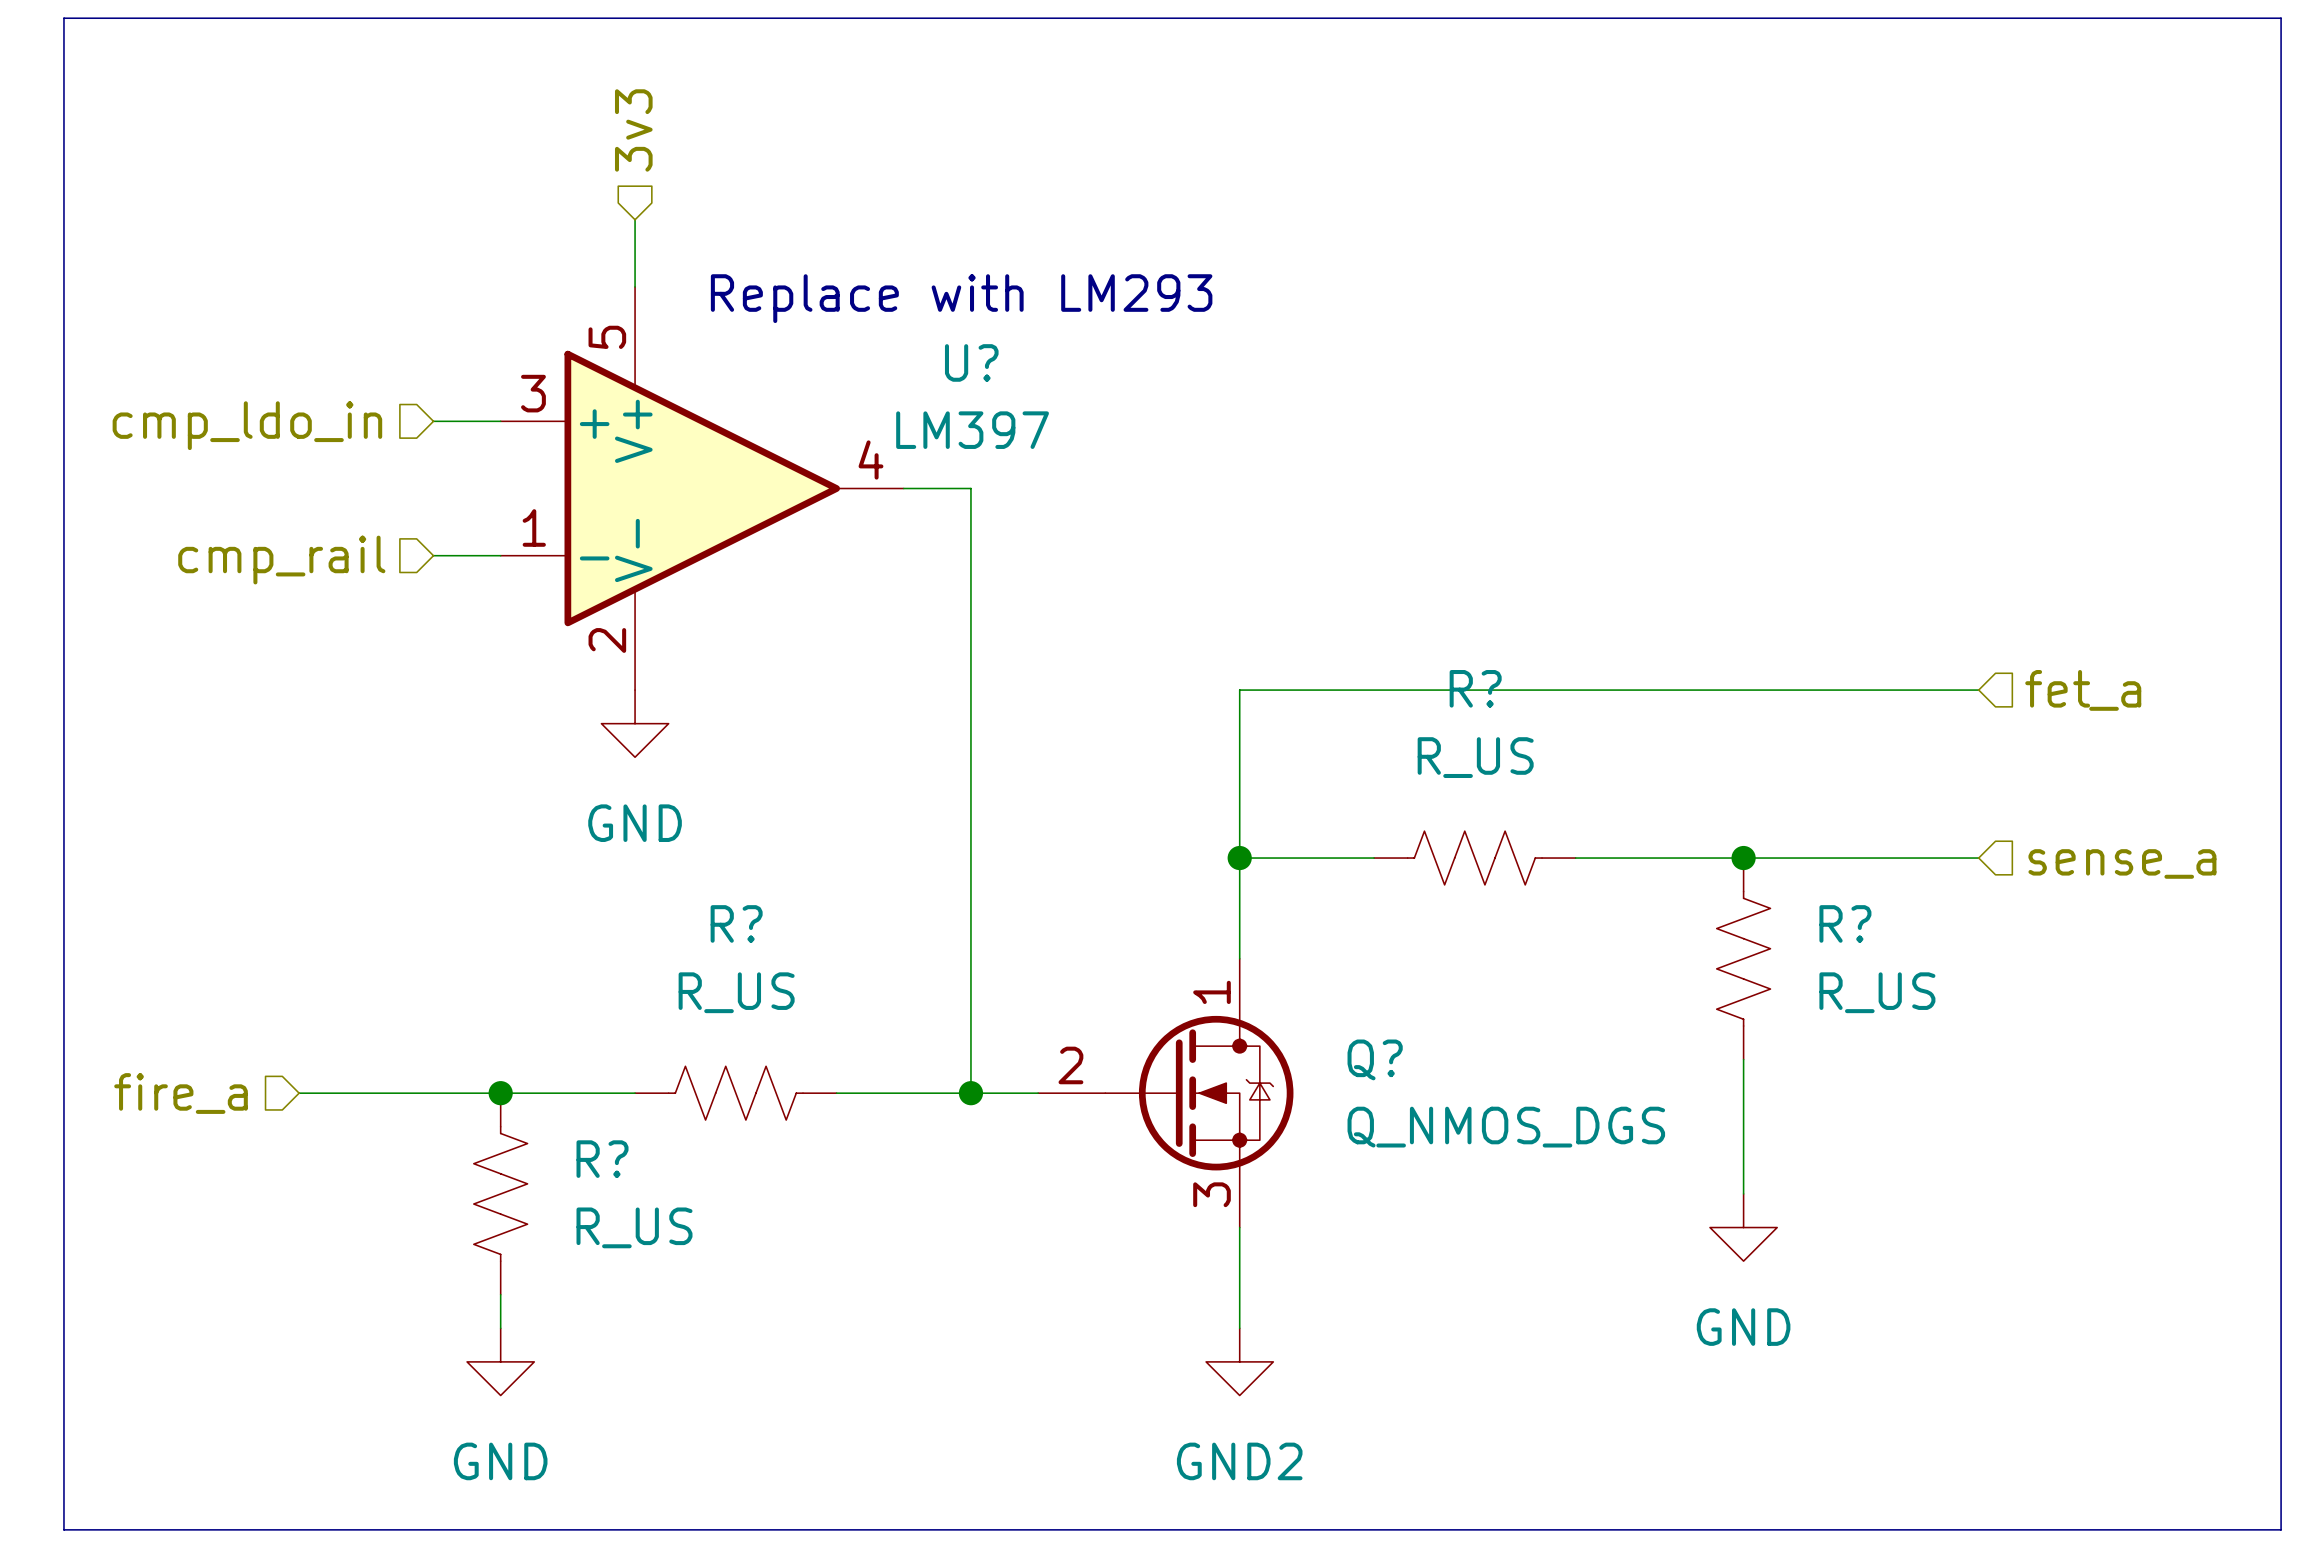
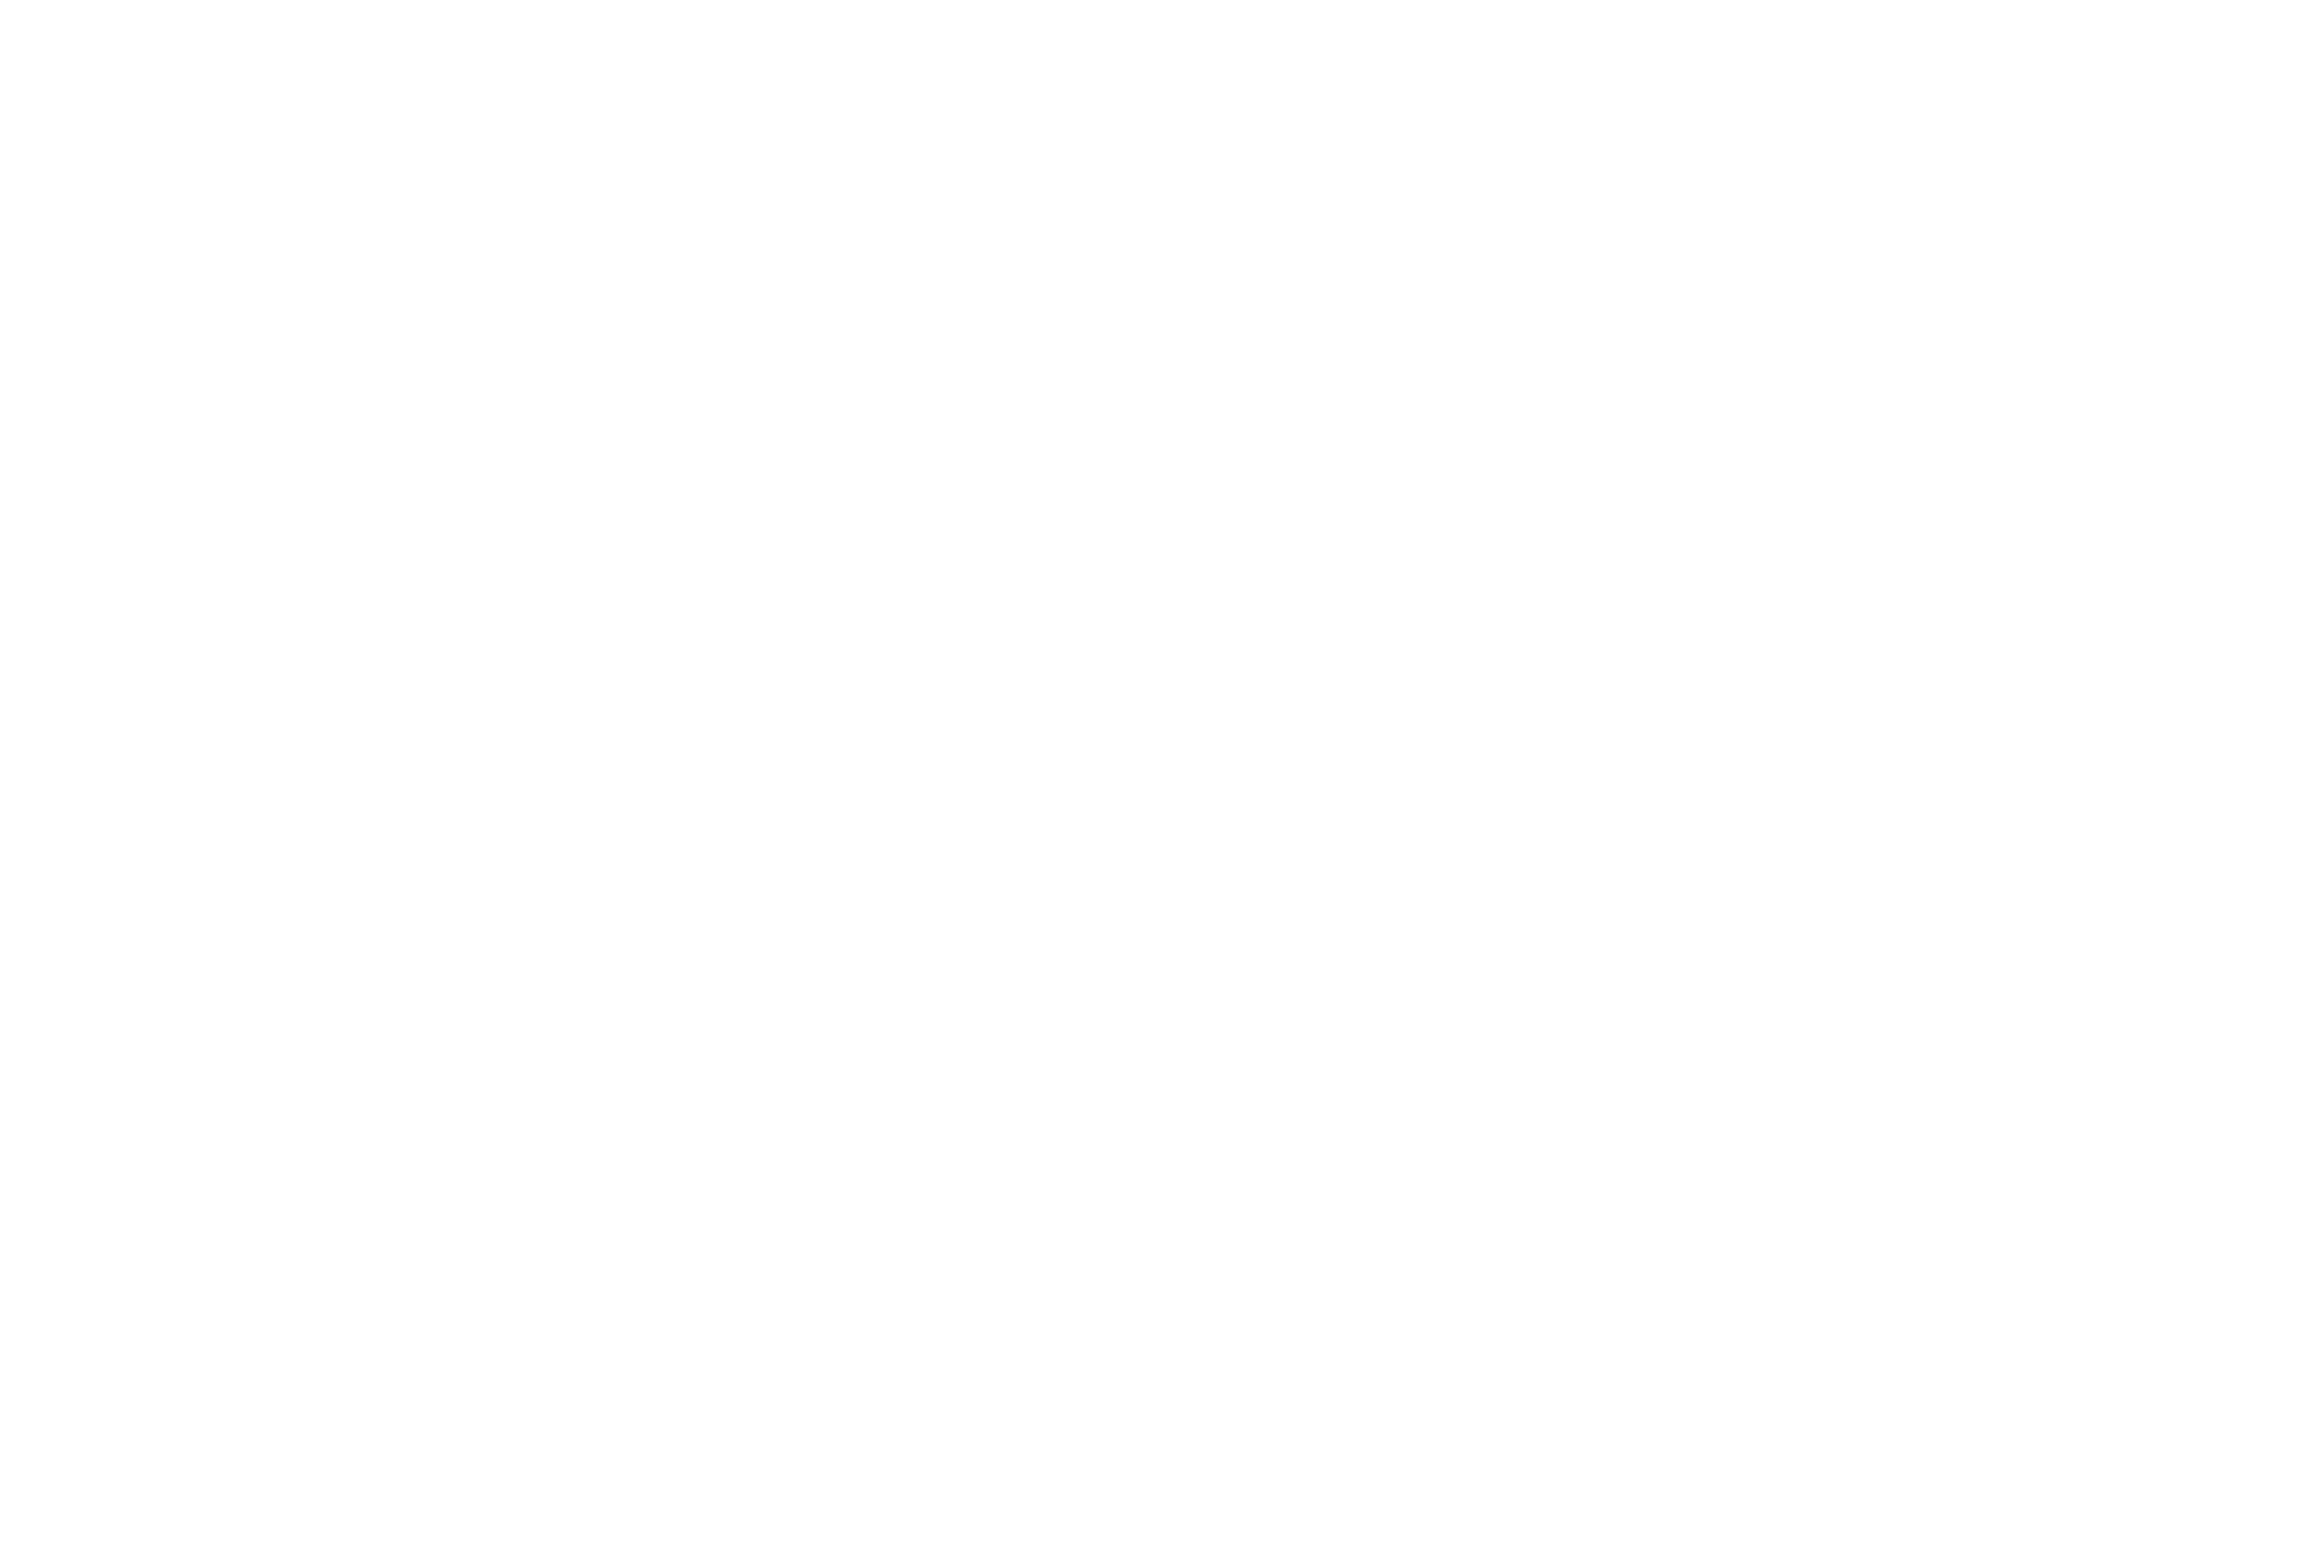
line: (63, 18) (2281, 18) (2281, 1529) (63, 1529) (63, 18) -> none
hierarchical label: 3v3 (633, 130) -> none
wire: (635, 219) (635, 286) -> none
text: Replace with LM293 (961, 298) -> none
wire: (433, 421) (500, 421) -> none
hierarchical label: cmp_ldo_in (247, 425) -> none
U?: LM397 (702, 488) -> none
wire: (903, 488) (970, 488) (970, 1093) -> none
wire: (433, 555) (500, 555) -> none
hierarchical label: cmp_rail (281, 560) -> none
wire: (1978, 690) (1239, 690) (1239, 958) -> none
hierarchical label: fet_a (2083, 690) -> none
power symbol: GND (635, 723) -> none
wire: (1239, 858) (1374, 858) -> none
junction: (1239, 858) -> none
R?: R_US (1474, 858) -> none
wire: (1575, 858) (1978, 858) -> none
junction: (1743, 858) -> none
hierarchical label: sense_a (2122, 863) -> none
R?: R_US (1743, 958) -> none
wire: (1743, 1059) (1743, 1193) -> none
hierarchical label: fire_a (181, 1093) -> none
wire: (299, 1093) (635, 1093) -> none
junction: (500, 1093) -> none
R?: R_US (735, 1093) -> none
wire: (836, 1093) (1038, 1093) -> none
junction: (970, 1093) -> none
Q?: Q_NMOS_DGS (1165, 1093) -> none
R?: R_US (500, 1193) -> none
wire: (1239, 1227) (1239, 1328) -> none
power symbol: GND (1743, 1227) -> none
wire: (500, 1294) (500, 1328) -> none
power symbol: GND (500, 1361) -> none
power symbol: GND2 (1239, 1361) -> none

